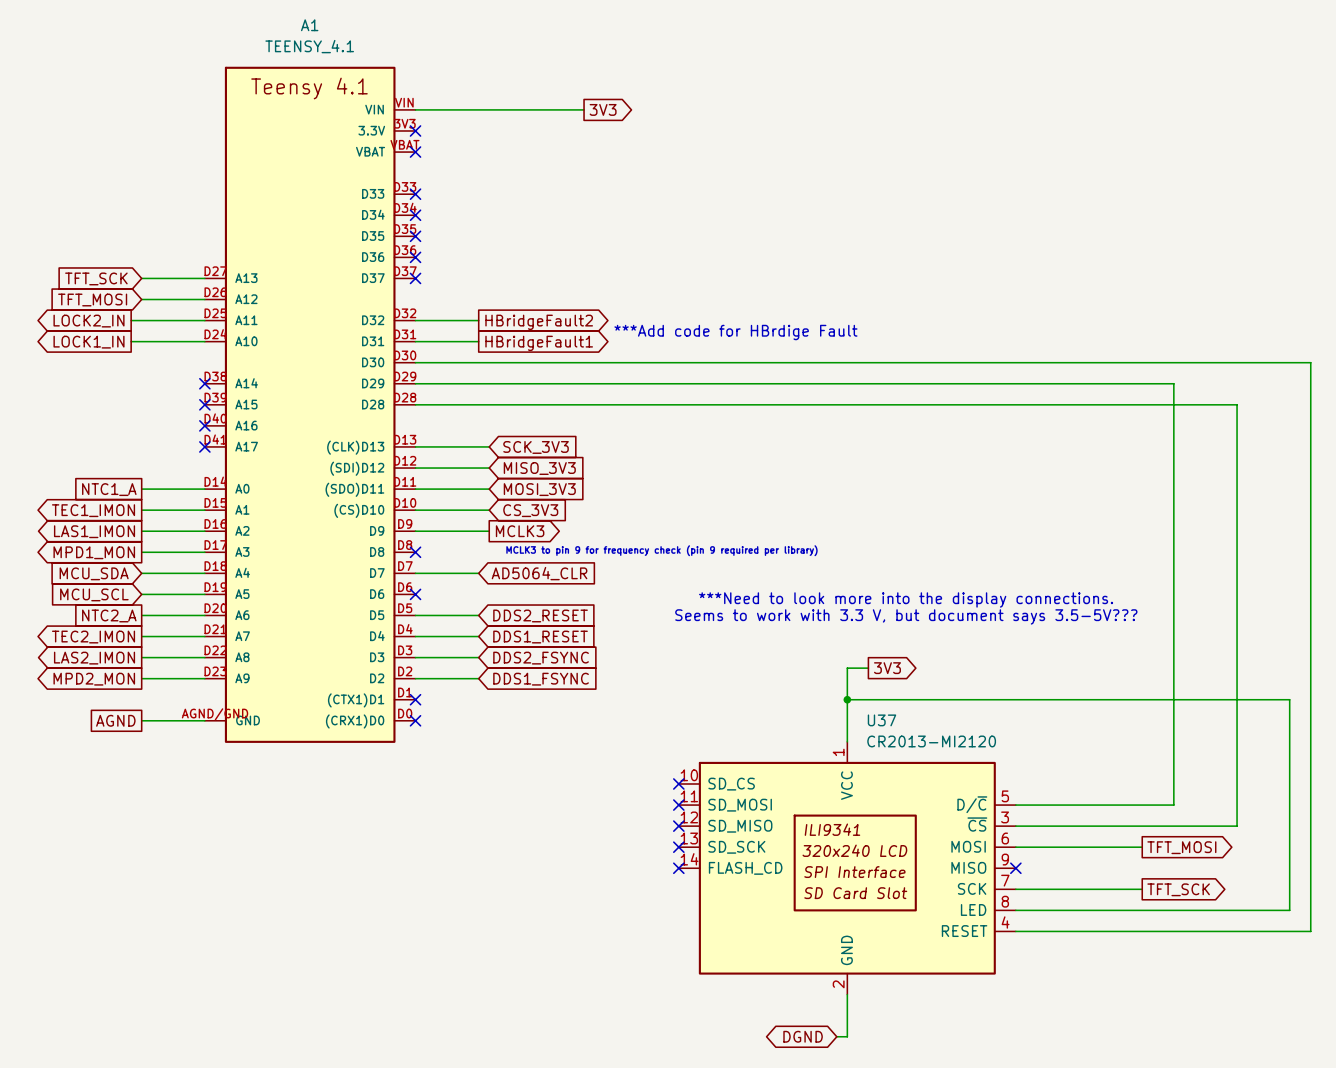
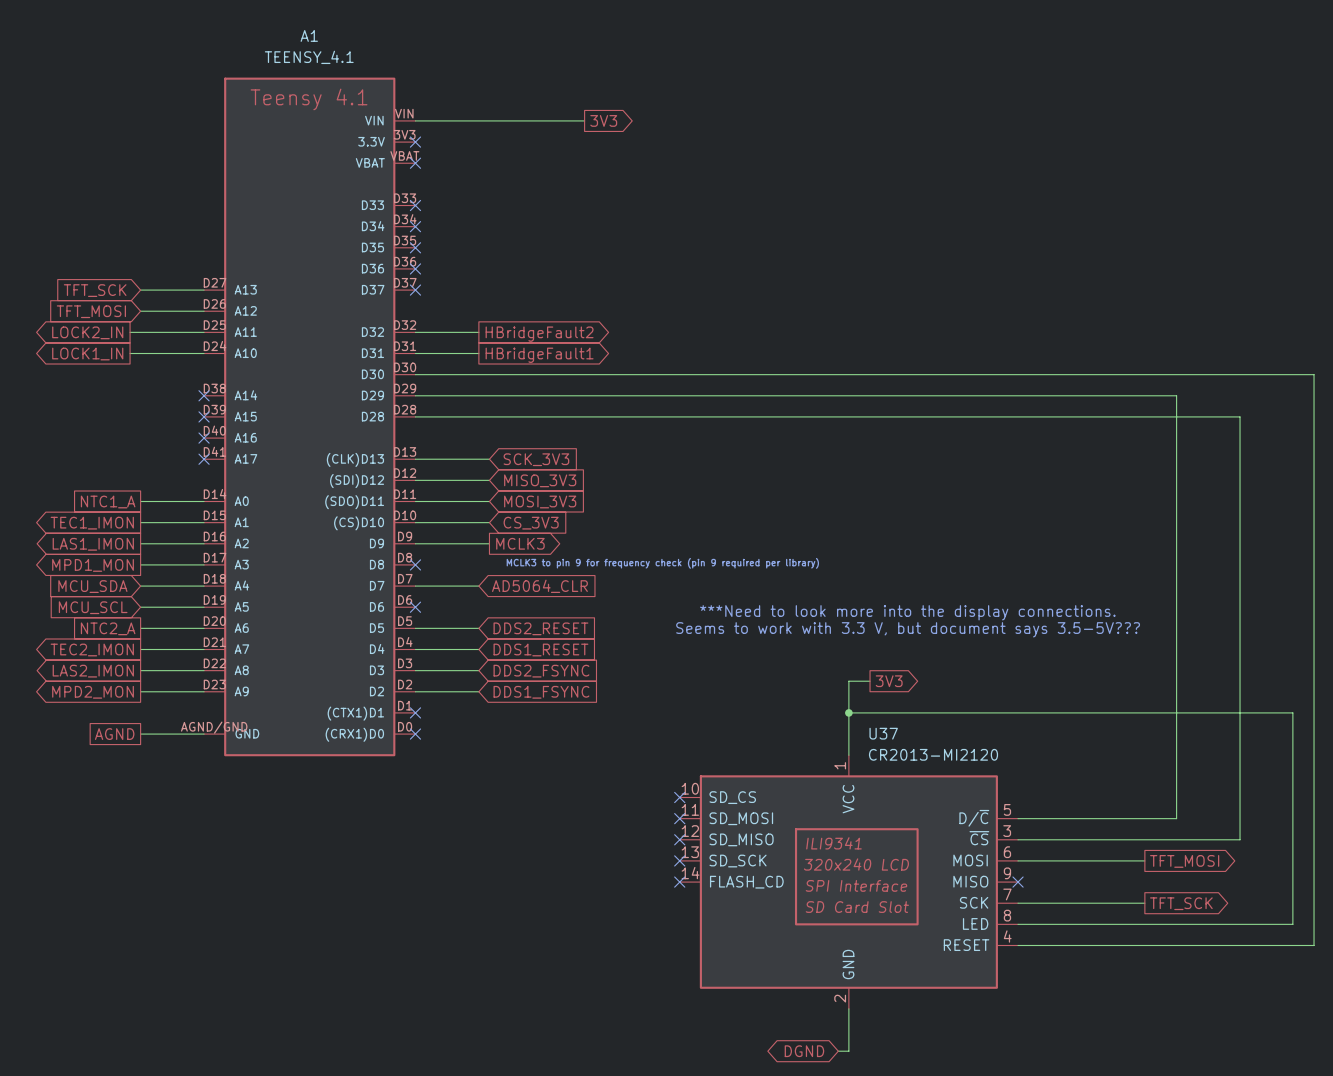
text: ***Add code for HBrdige Fault (735, 332) -> none

